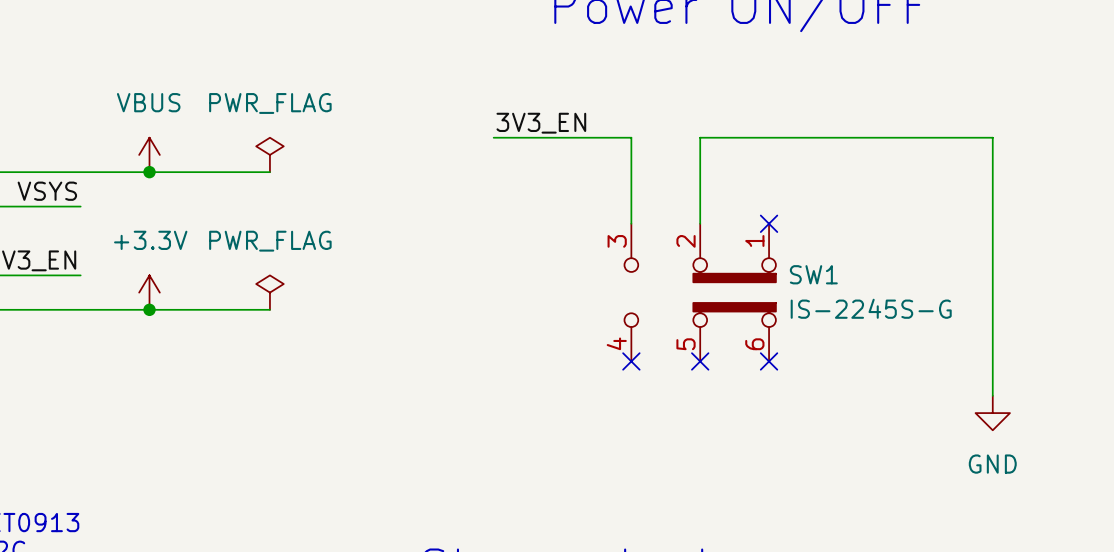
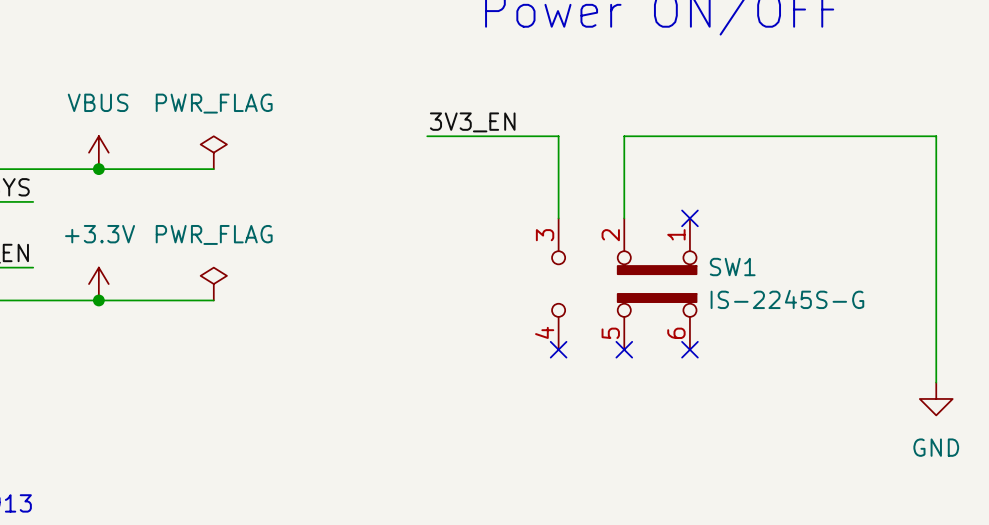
wire: (992, 137) (992, 395) -> (903, 136) (936, 136) (936, 382)
power symbol position: GND (992, 413) -> GND (936, 398)

